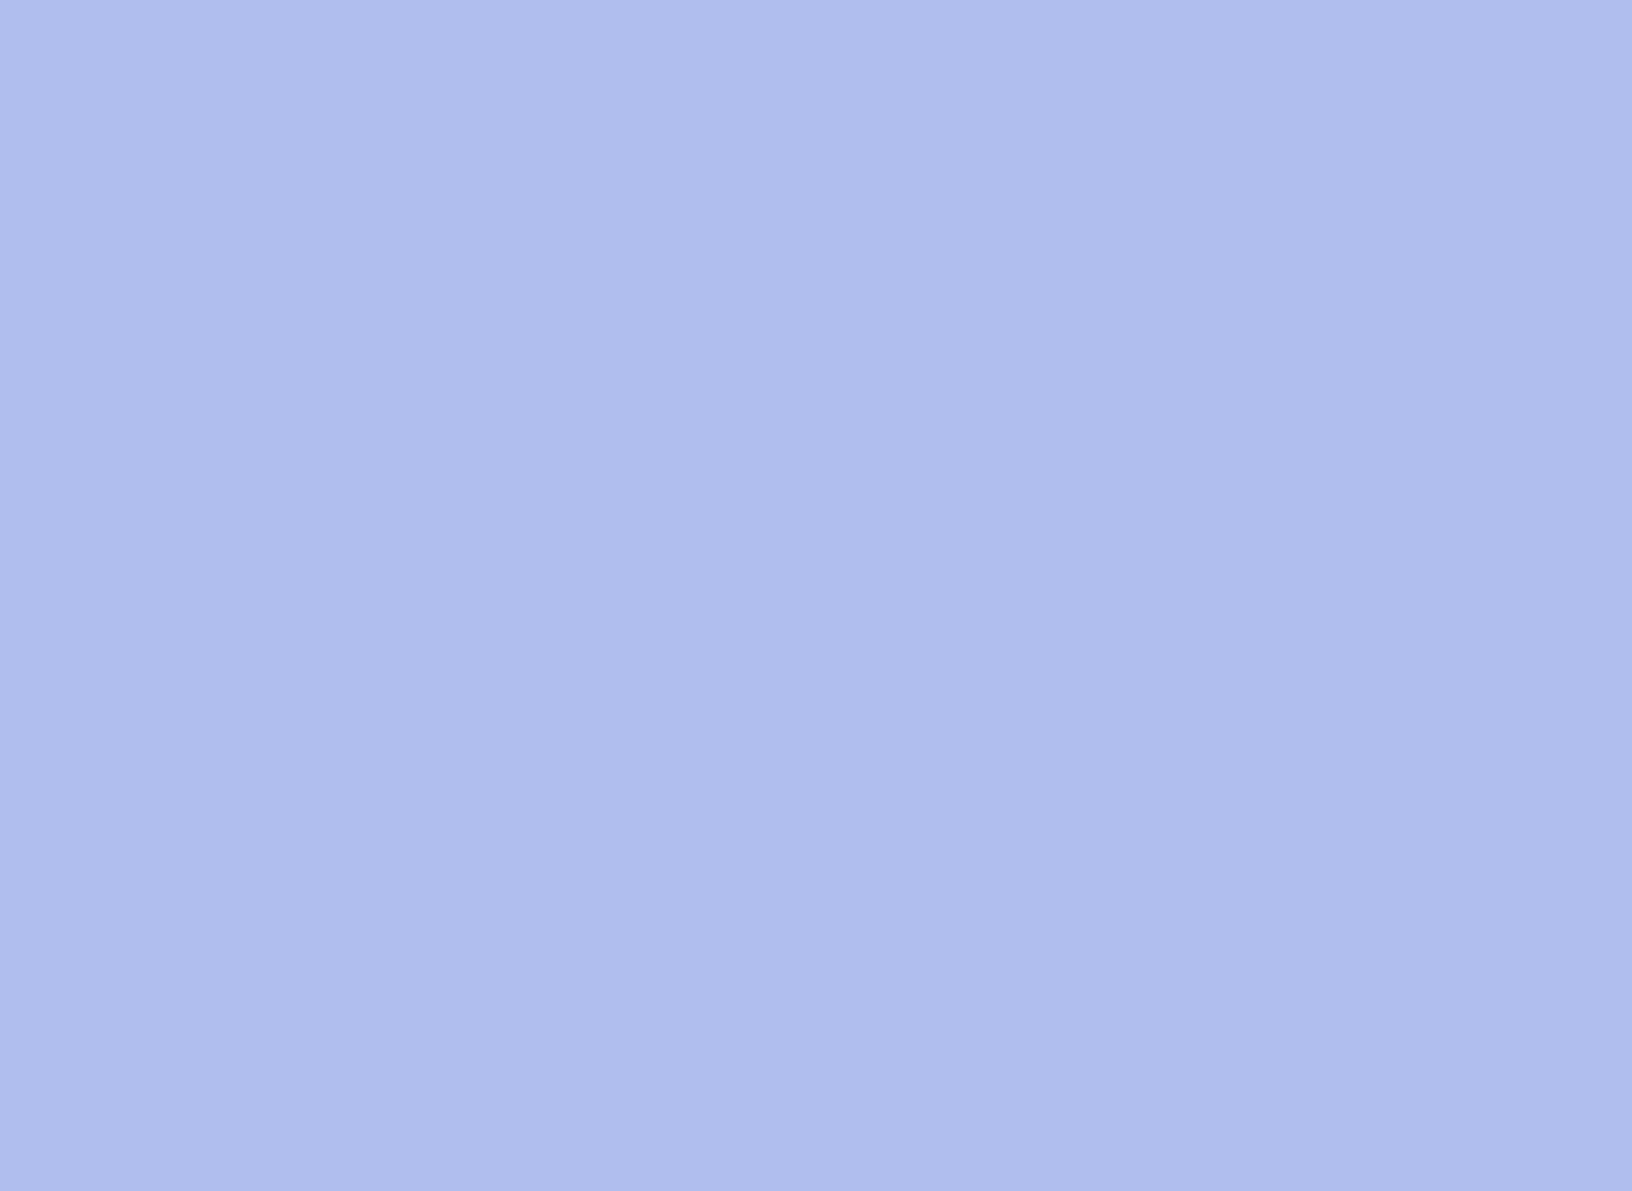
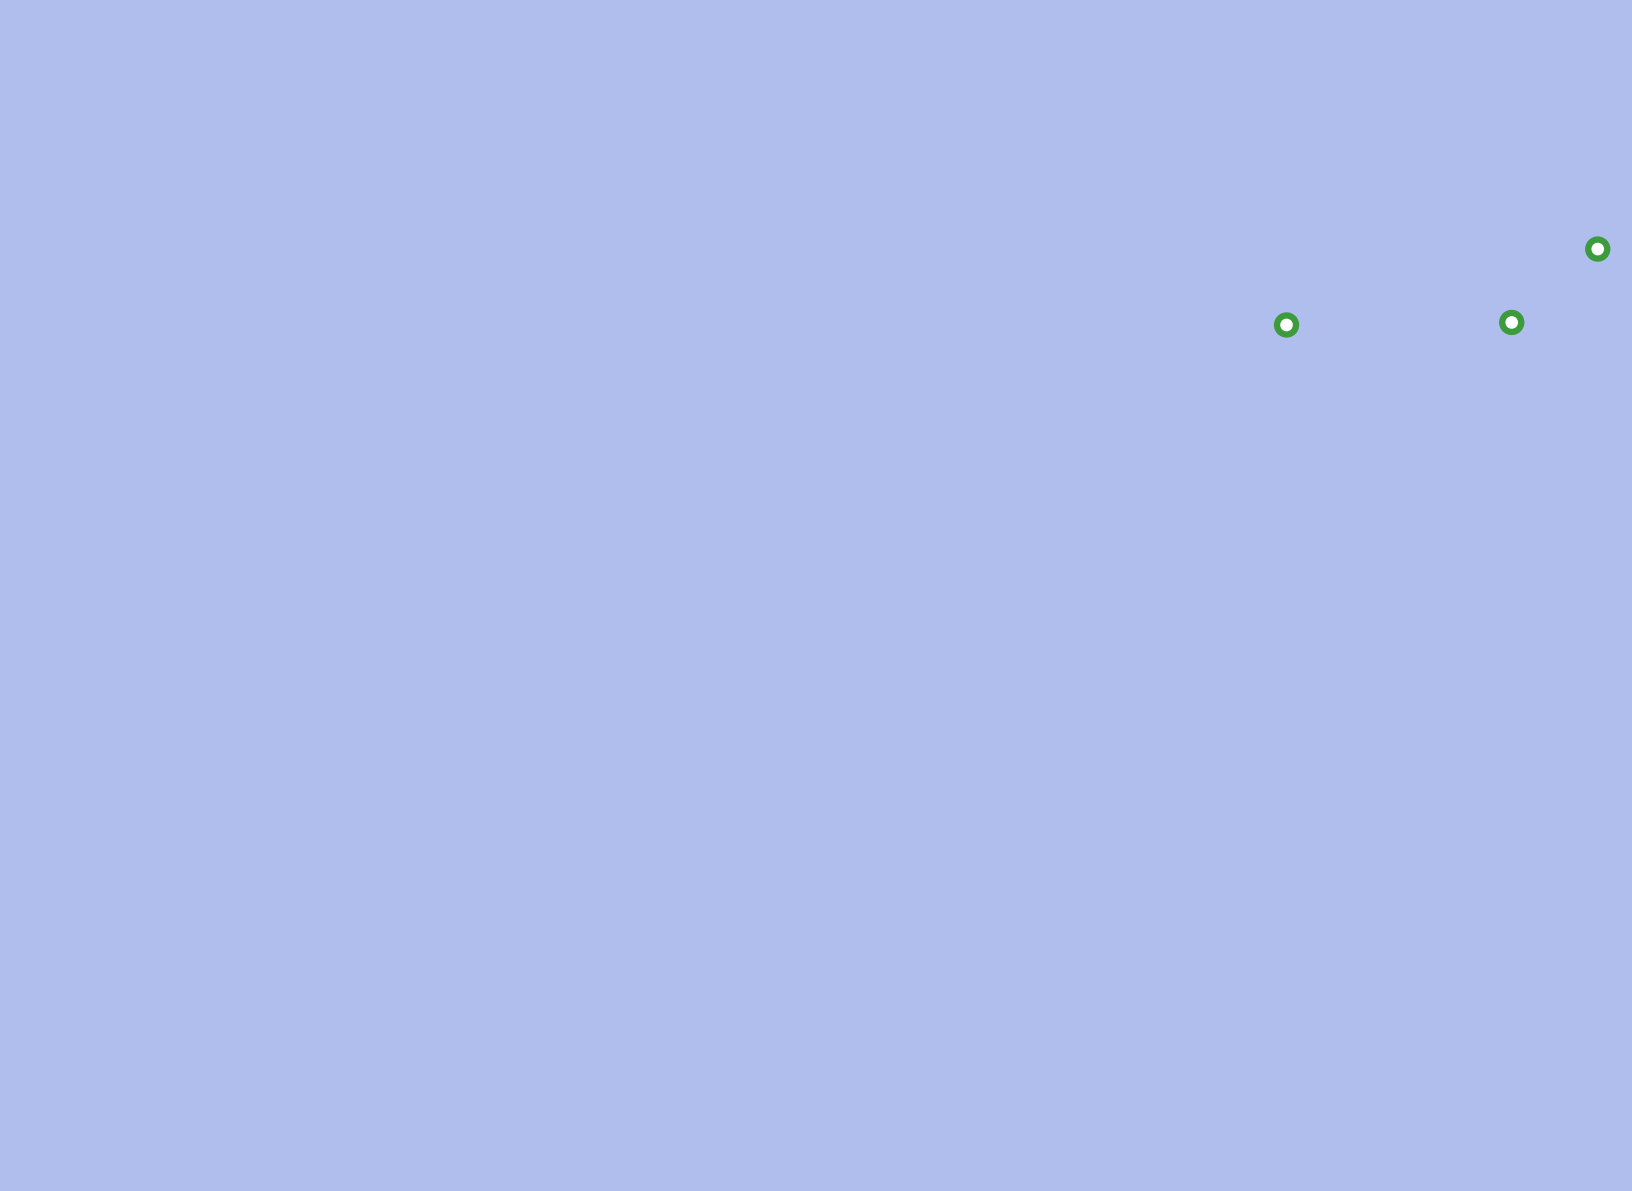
via: none -> (1597, 249)
via: none -> (1511, 322)
via: none -> (1286, 324)

